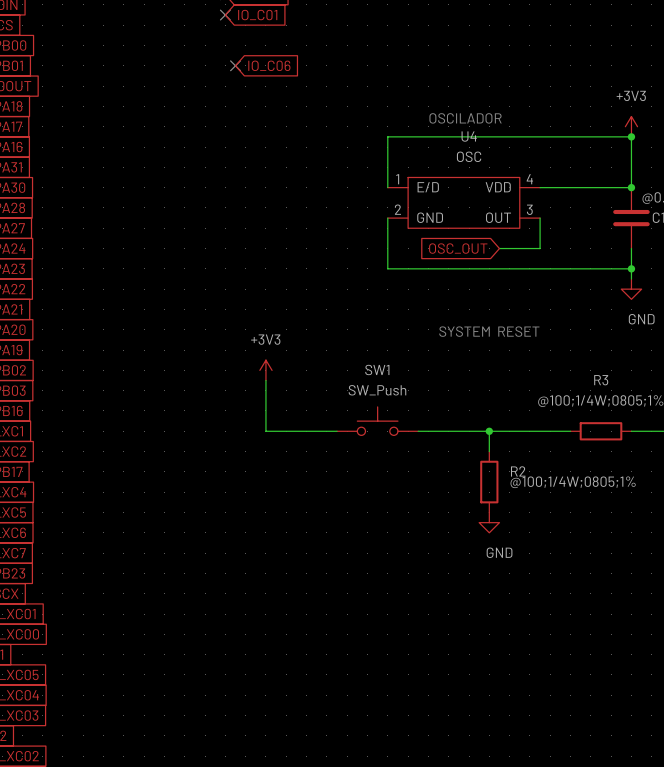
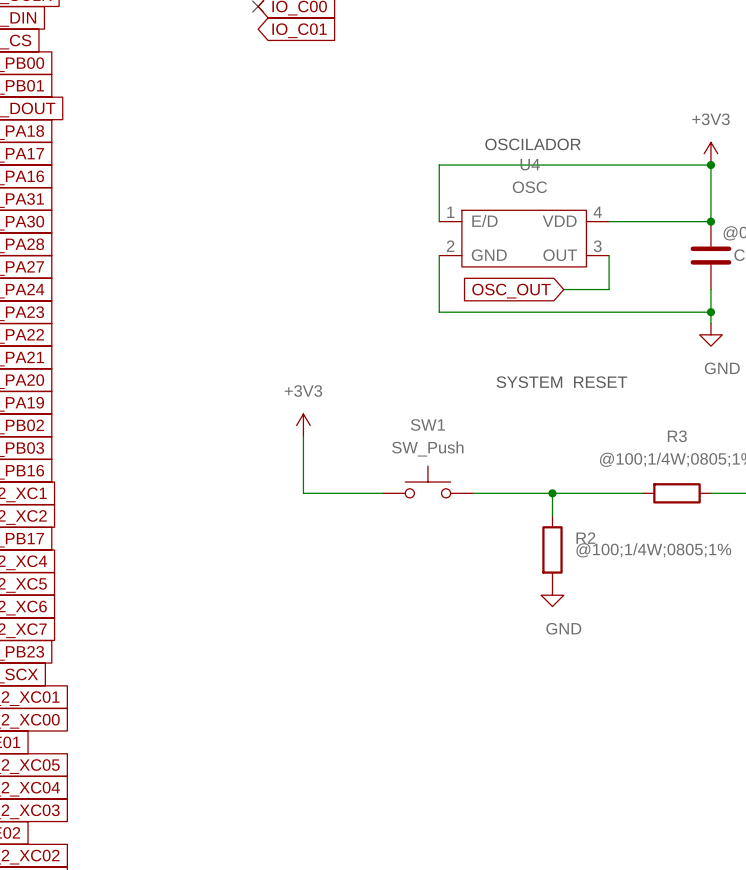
no-connect mark: (225, 15) -> none
no-connect mark: (235, 65) -> none
global label: IO_C06 (269, 65) -> none

